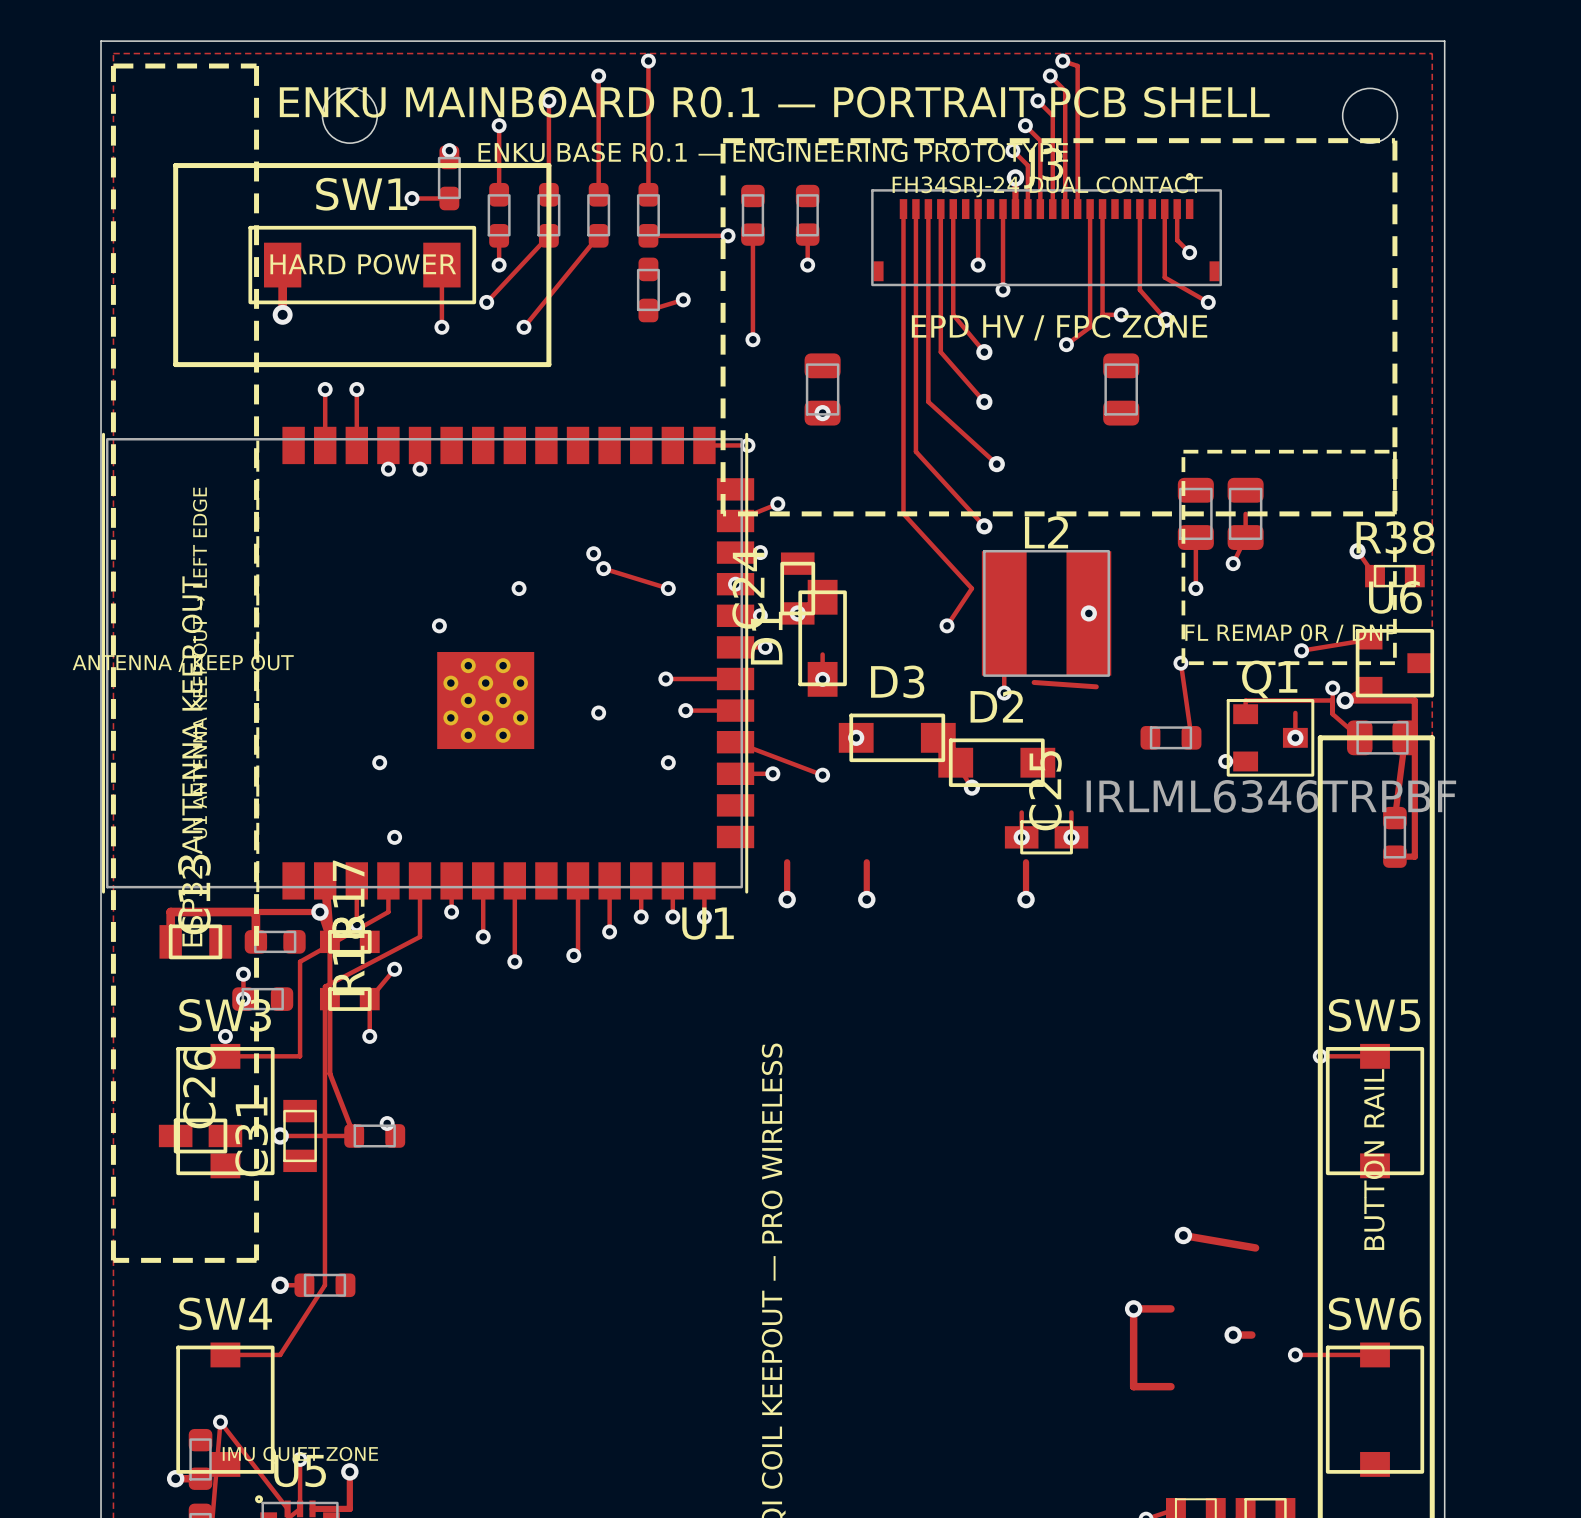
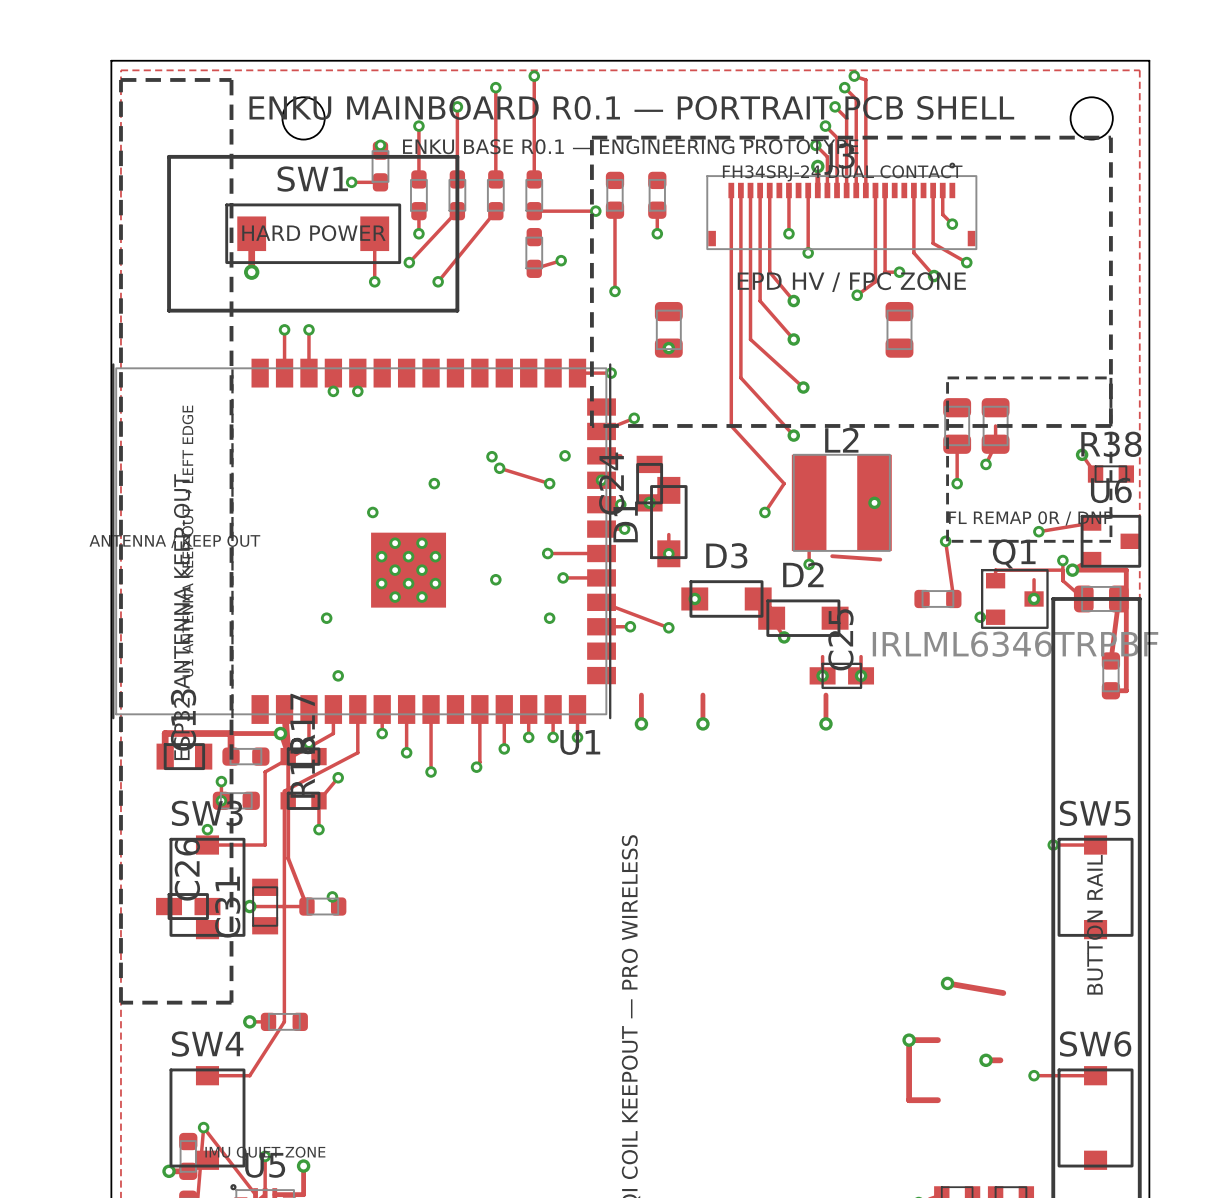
via position: (760, 552) -> (565, 455)

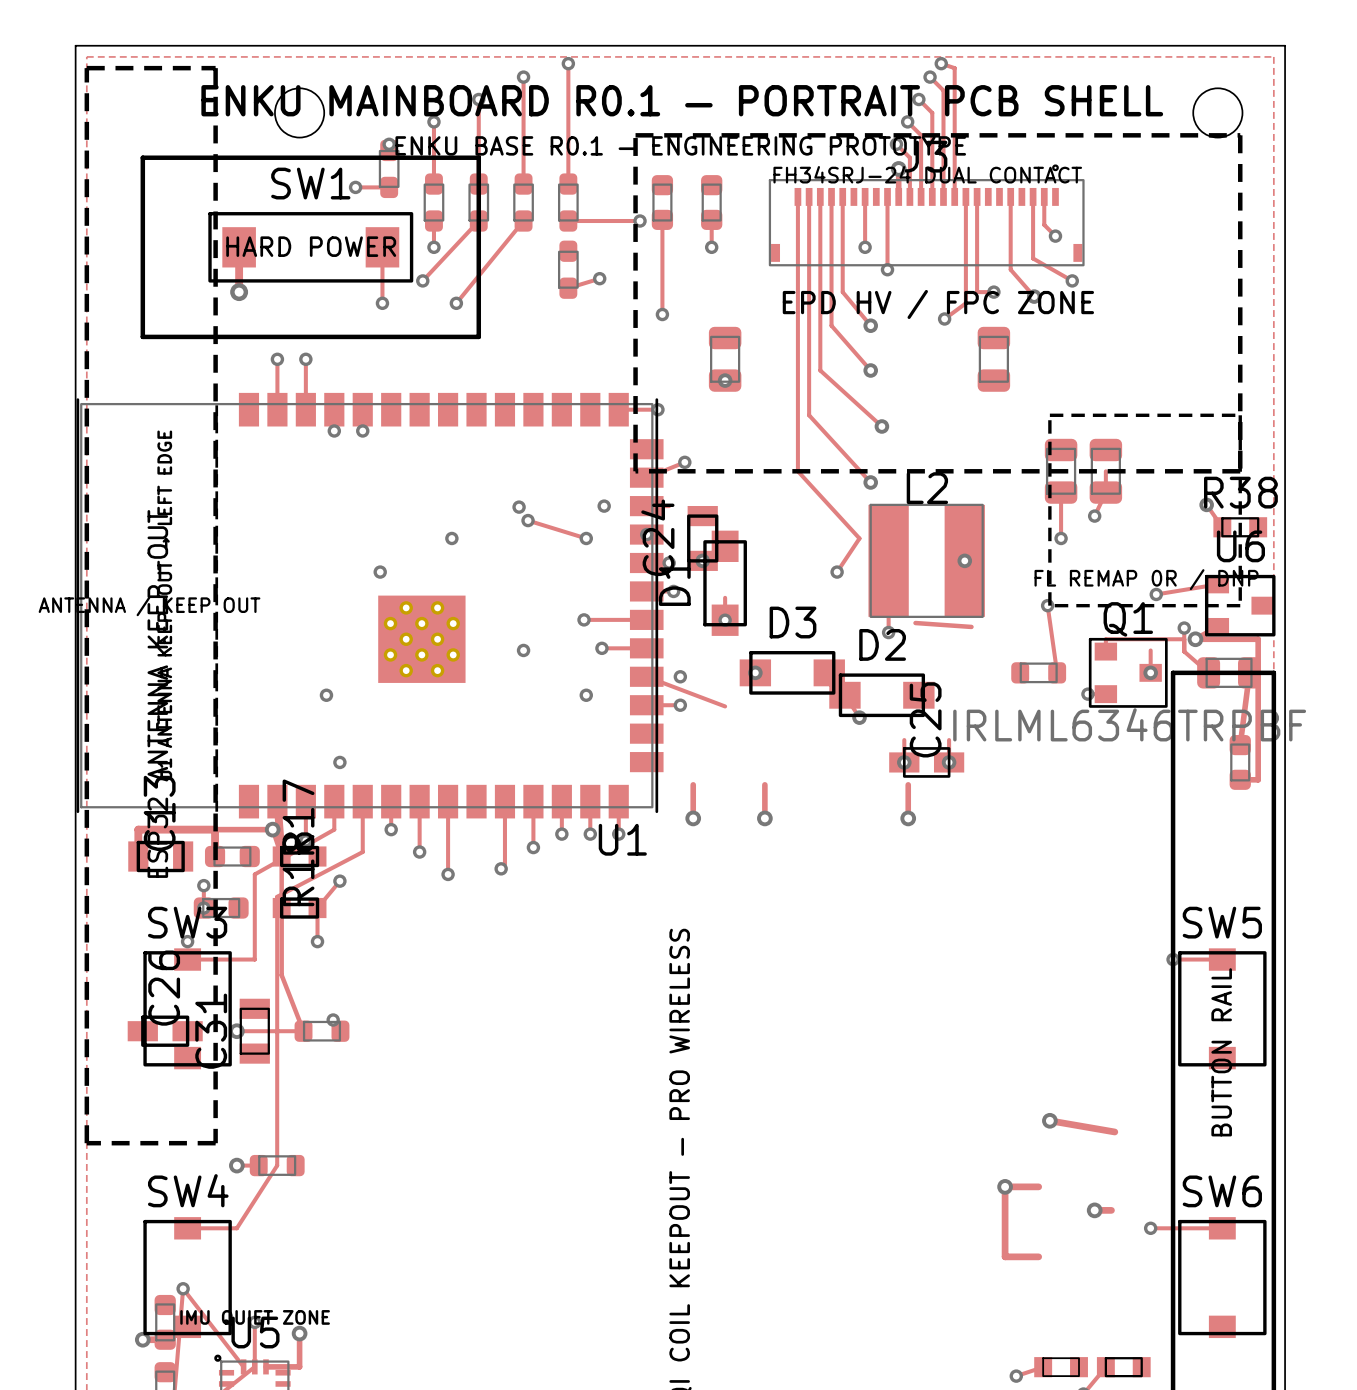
via position: (668, 627) -> (680, 676)

